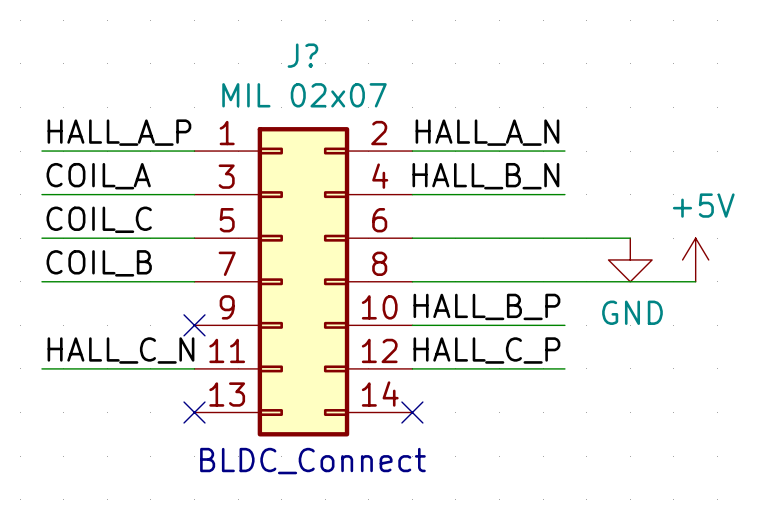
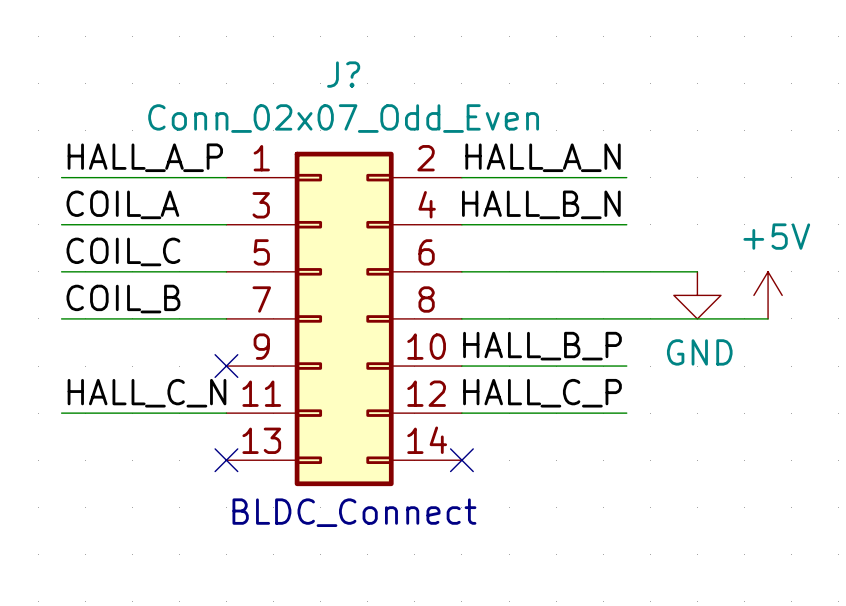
J? value: MIL 02x07 (304, 95) -> Conn_02x07_Odd_Even (343, 118)

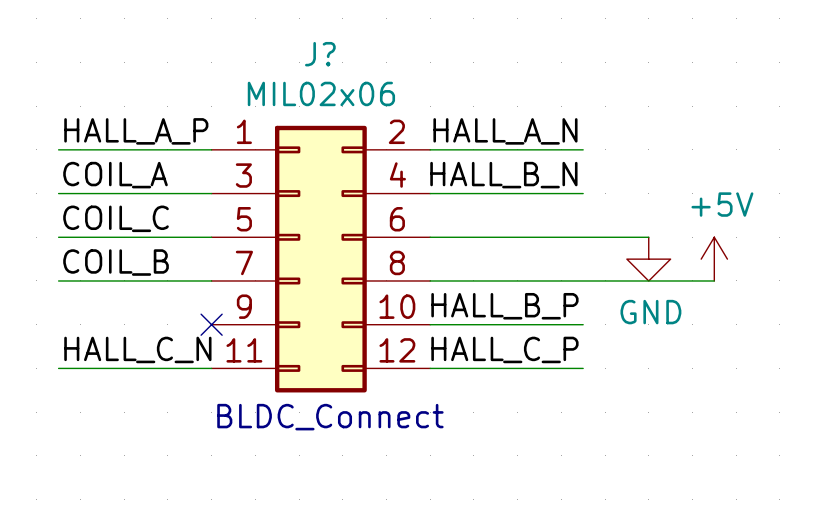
J?: none -> MIL02x06 (320, 259)
J?: Conn_02x07_Odd_Even (344, 318) -> none
no-connect mark: (226, 460) -> none
no-connect mark: (461, 460) -> none
text position: BLDC_Connect (354, 512) -> BLDC_Connect (330, 417)

